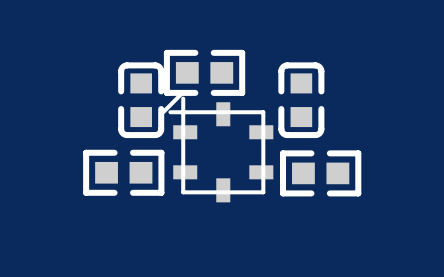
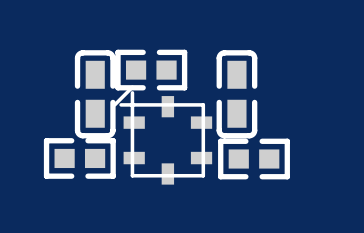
part footprint: [118, 62, 165, 139] -> [74, 50, 116, 139]
part footprint: [278, 62, 325, 139] -> [216, 50, 258, 139]

